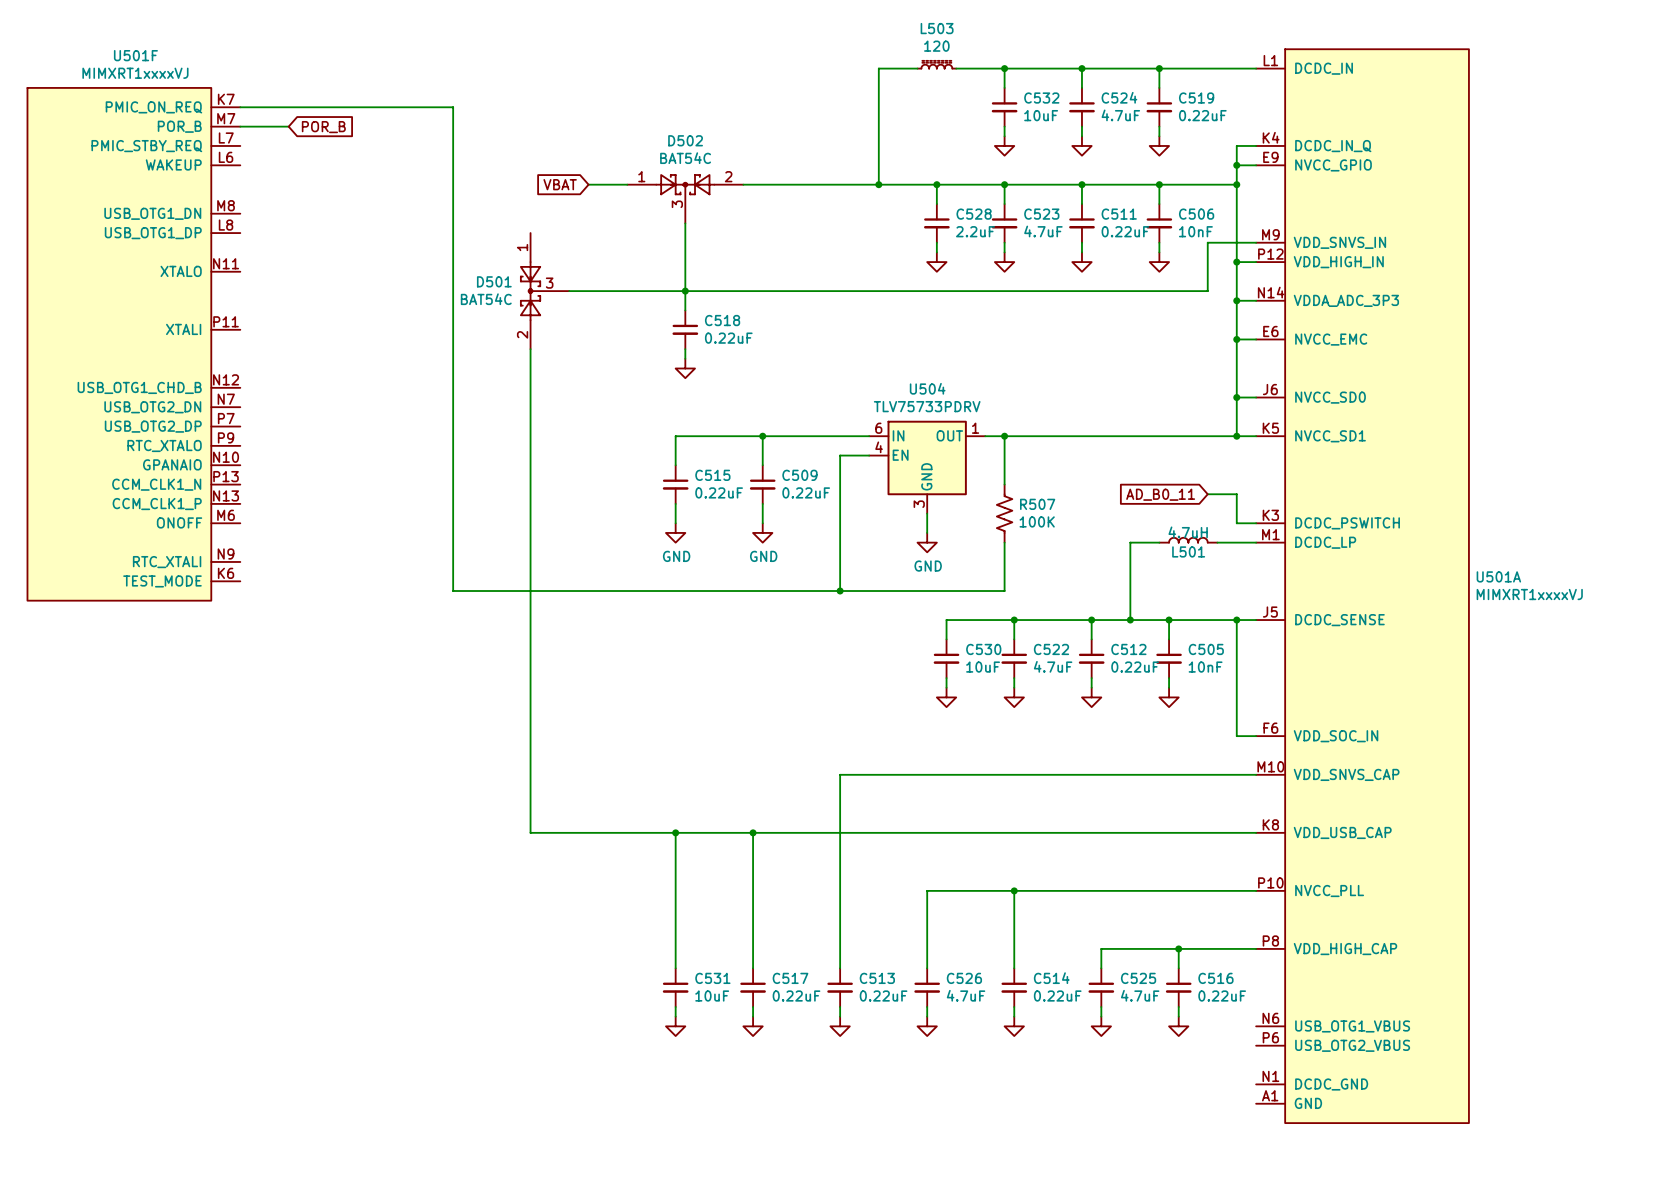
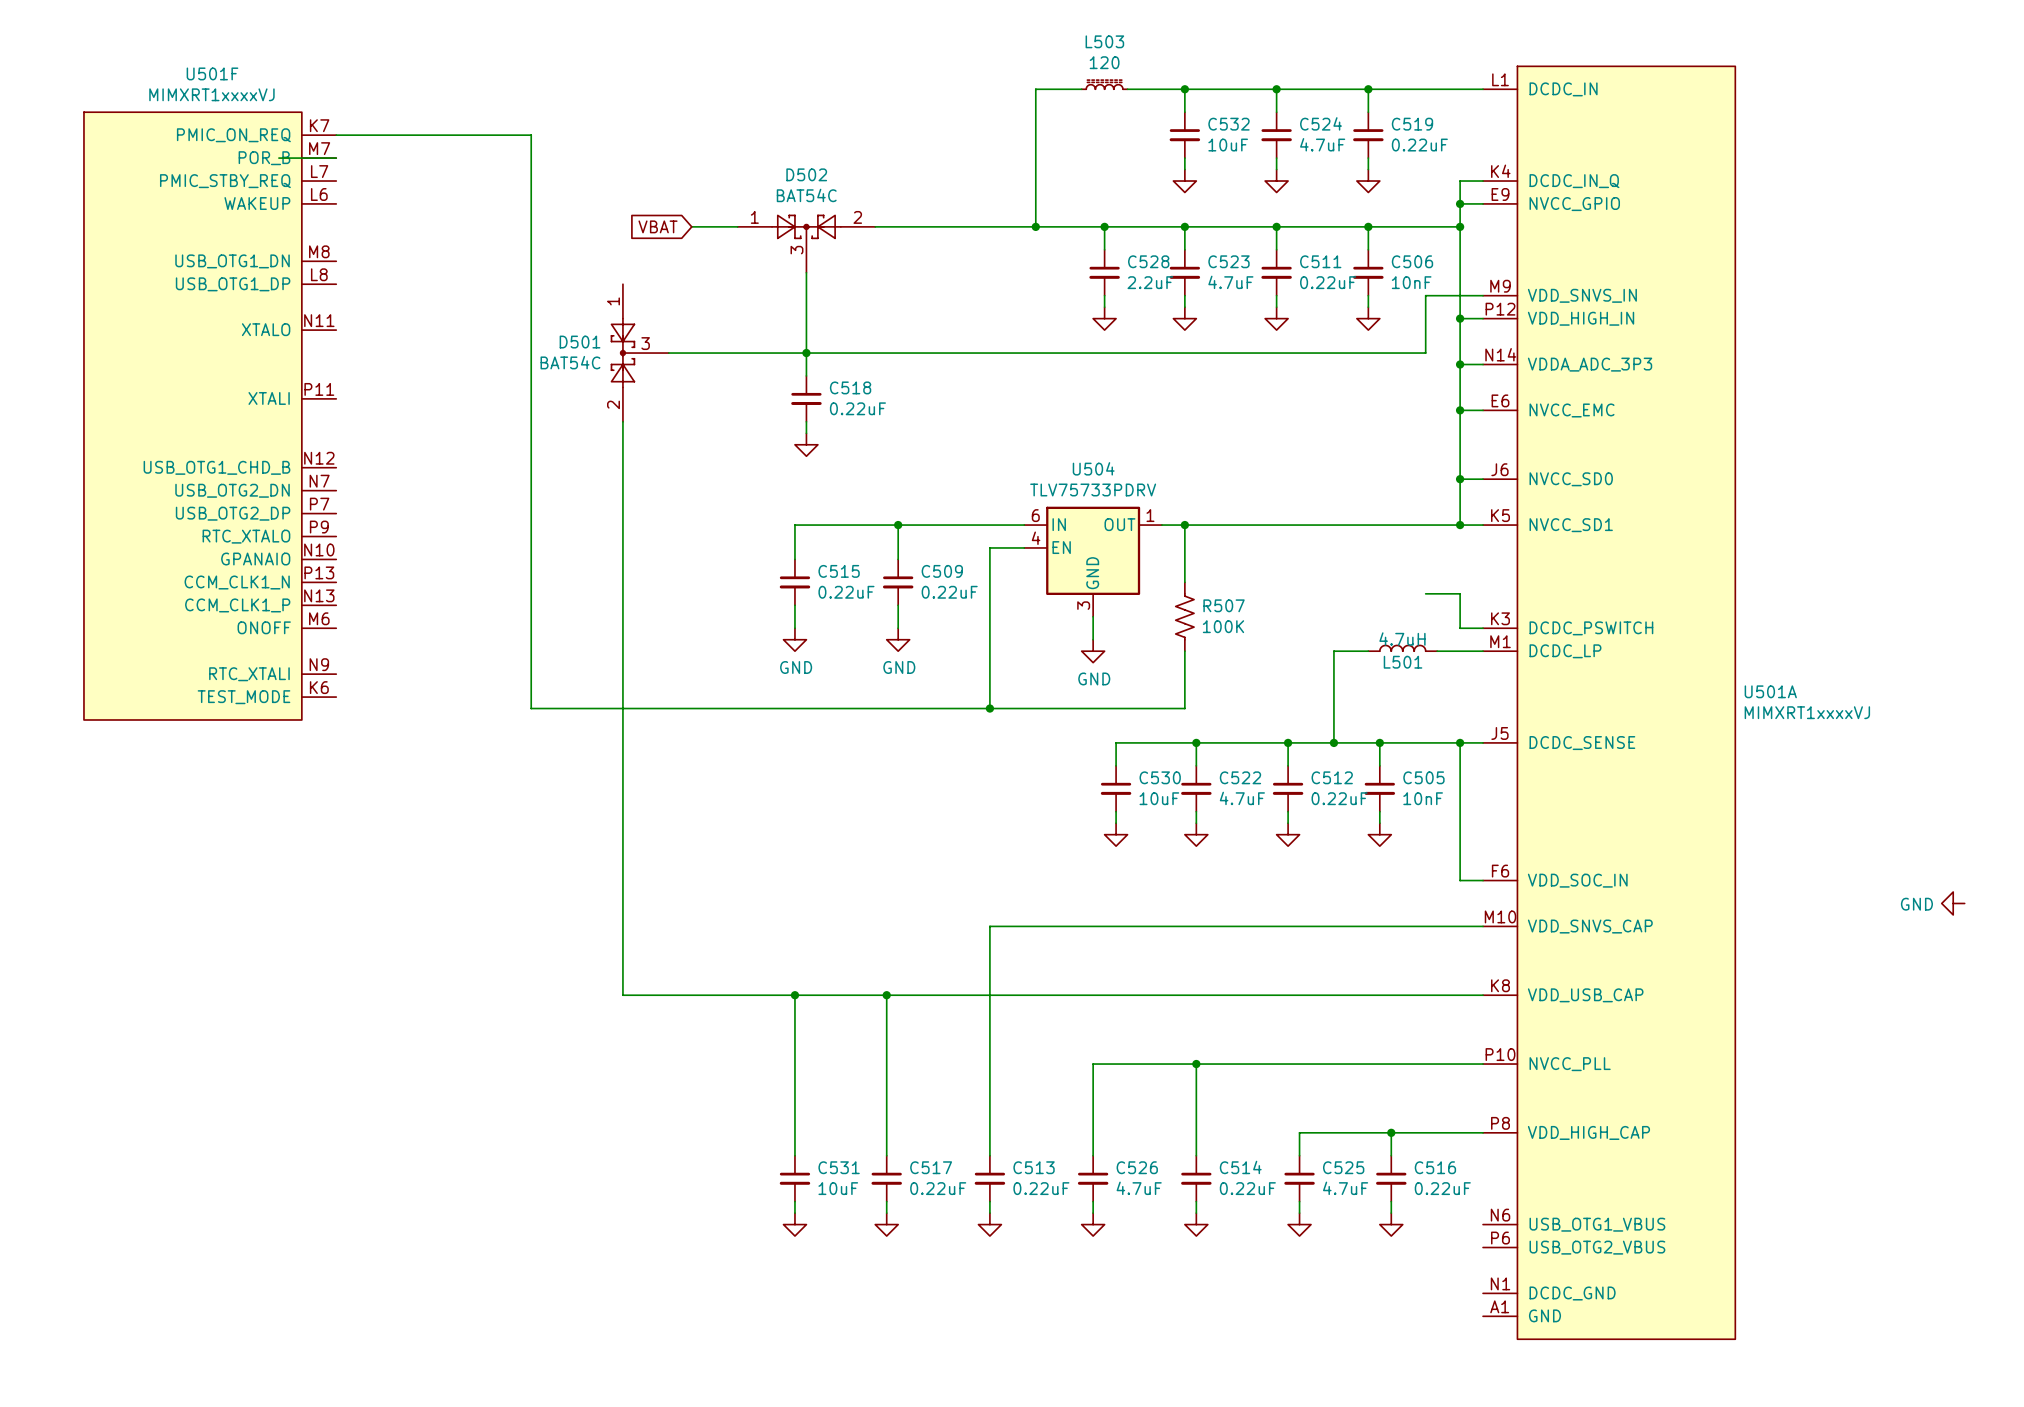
global label: POR_B (323, 127) -> none
U501F position: (133, 344) -> (210, 416)
global label: AD_B0_11 (1160, 494) -> none
power symbol: none -> GND (1953, 903)

